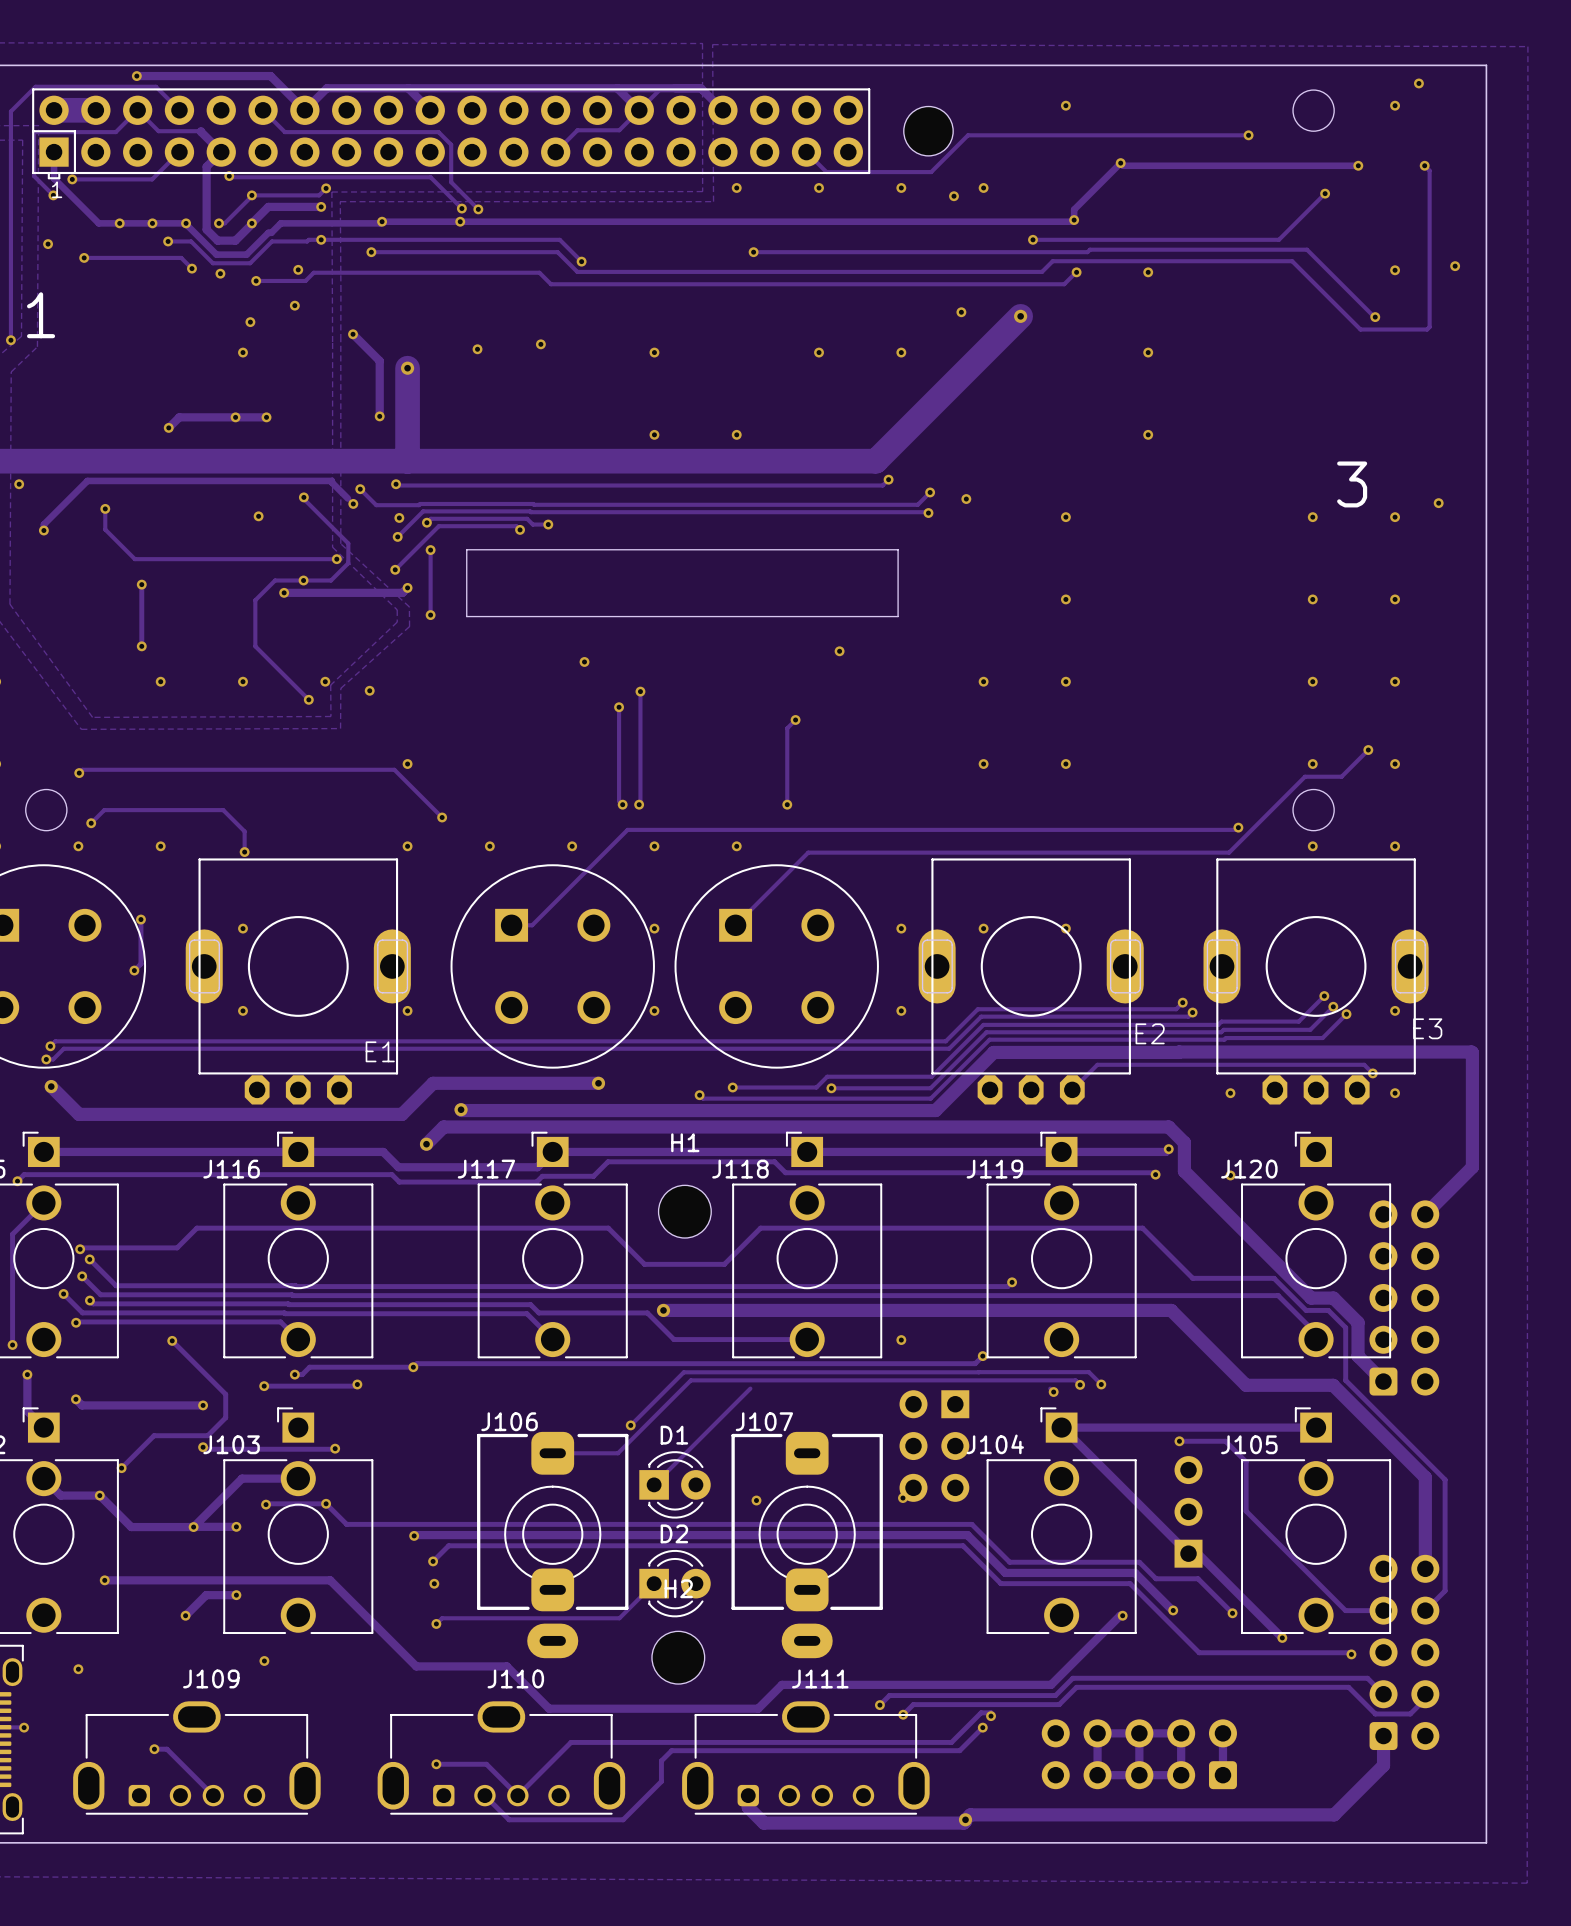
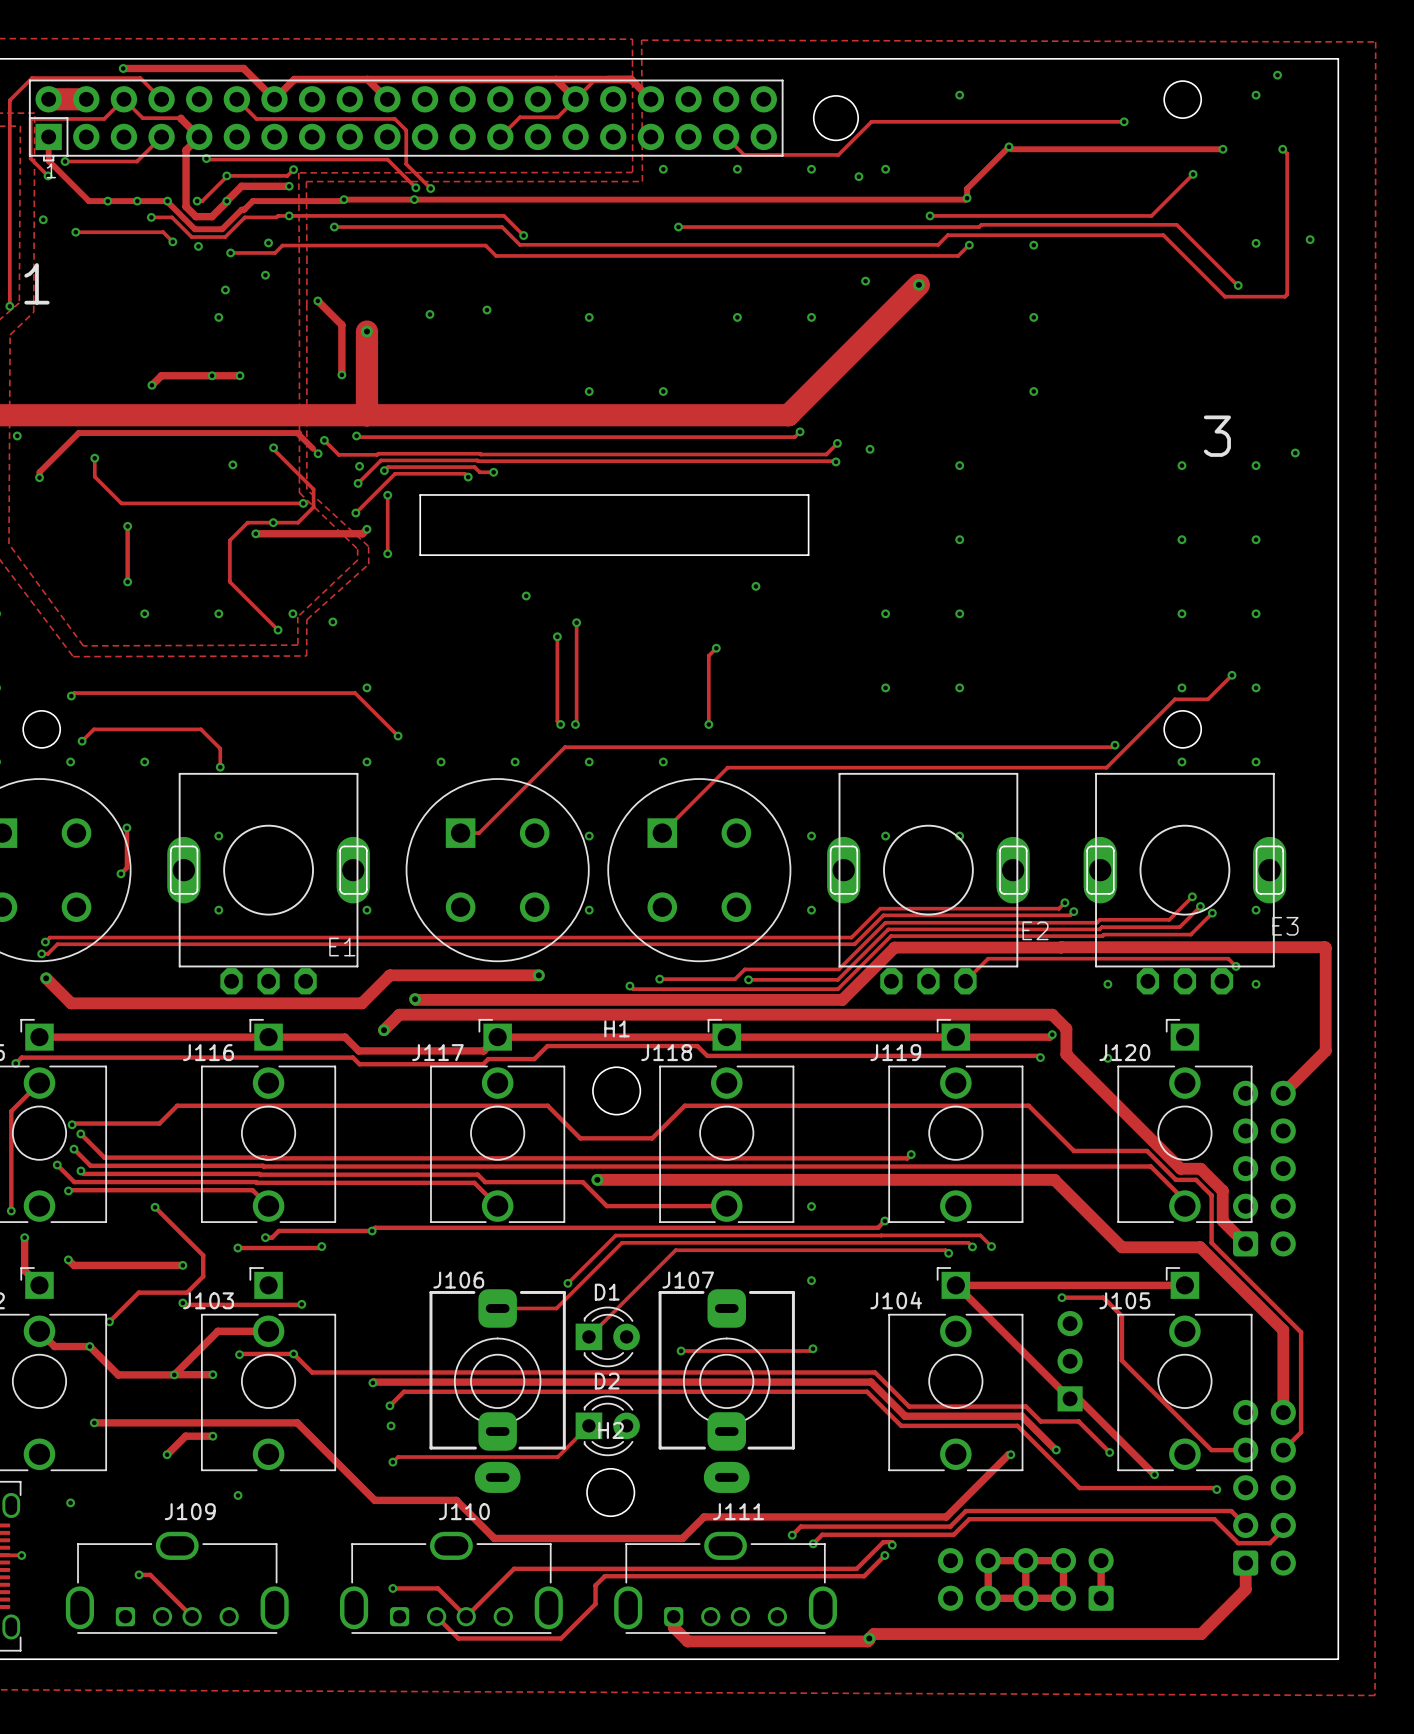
track: none -> (675, 1250) (945, 1250)
via: none -> (811, 1280)
part: (934, 1446) -> none
track: none -> (812, 1348) (810, 1351) (681, 1351)

